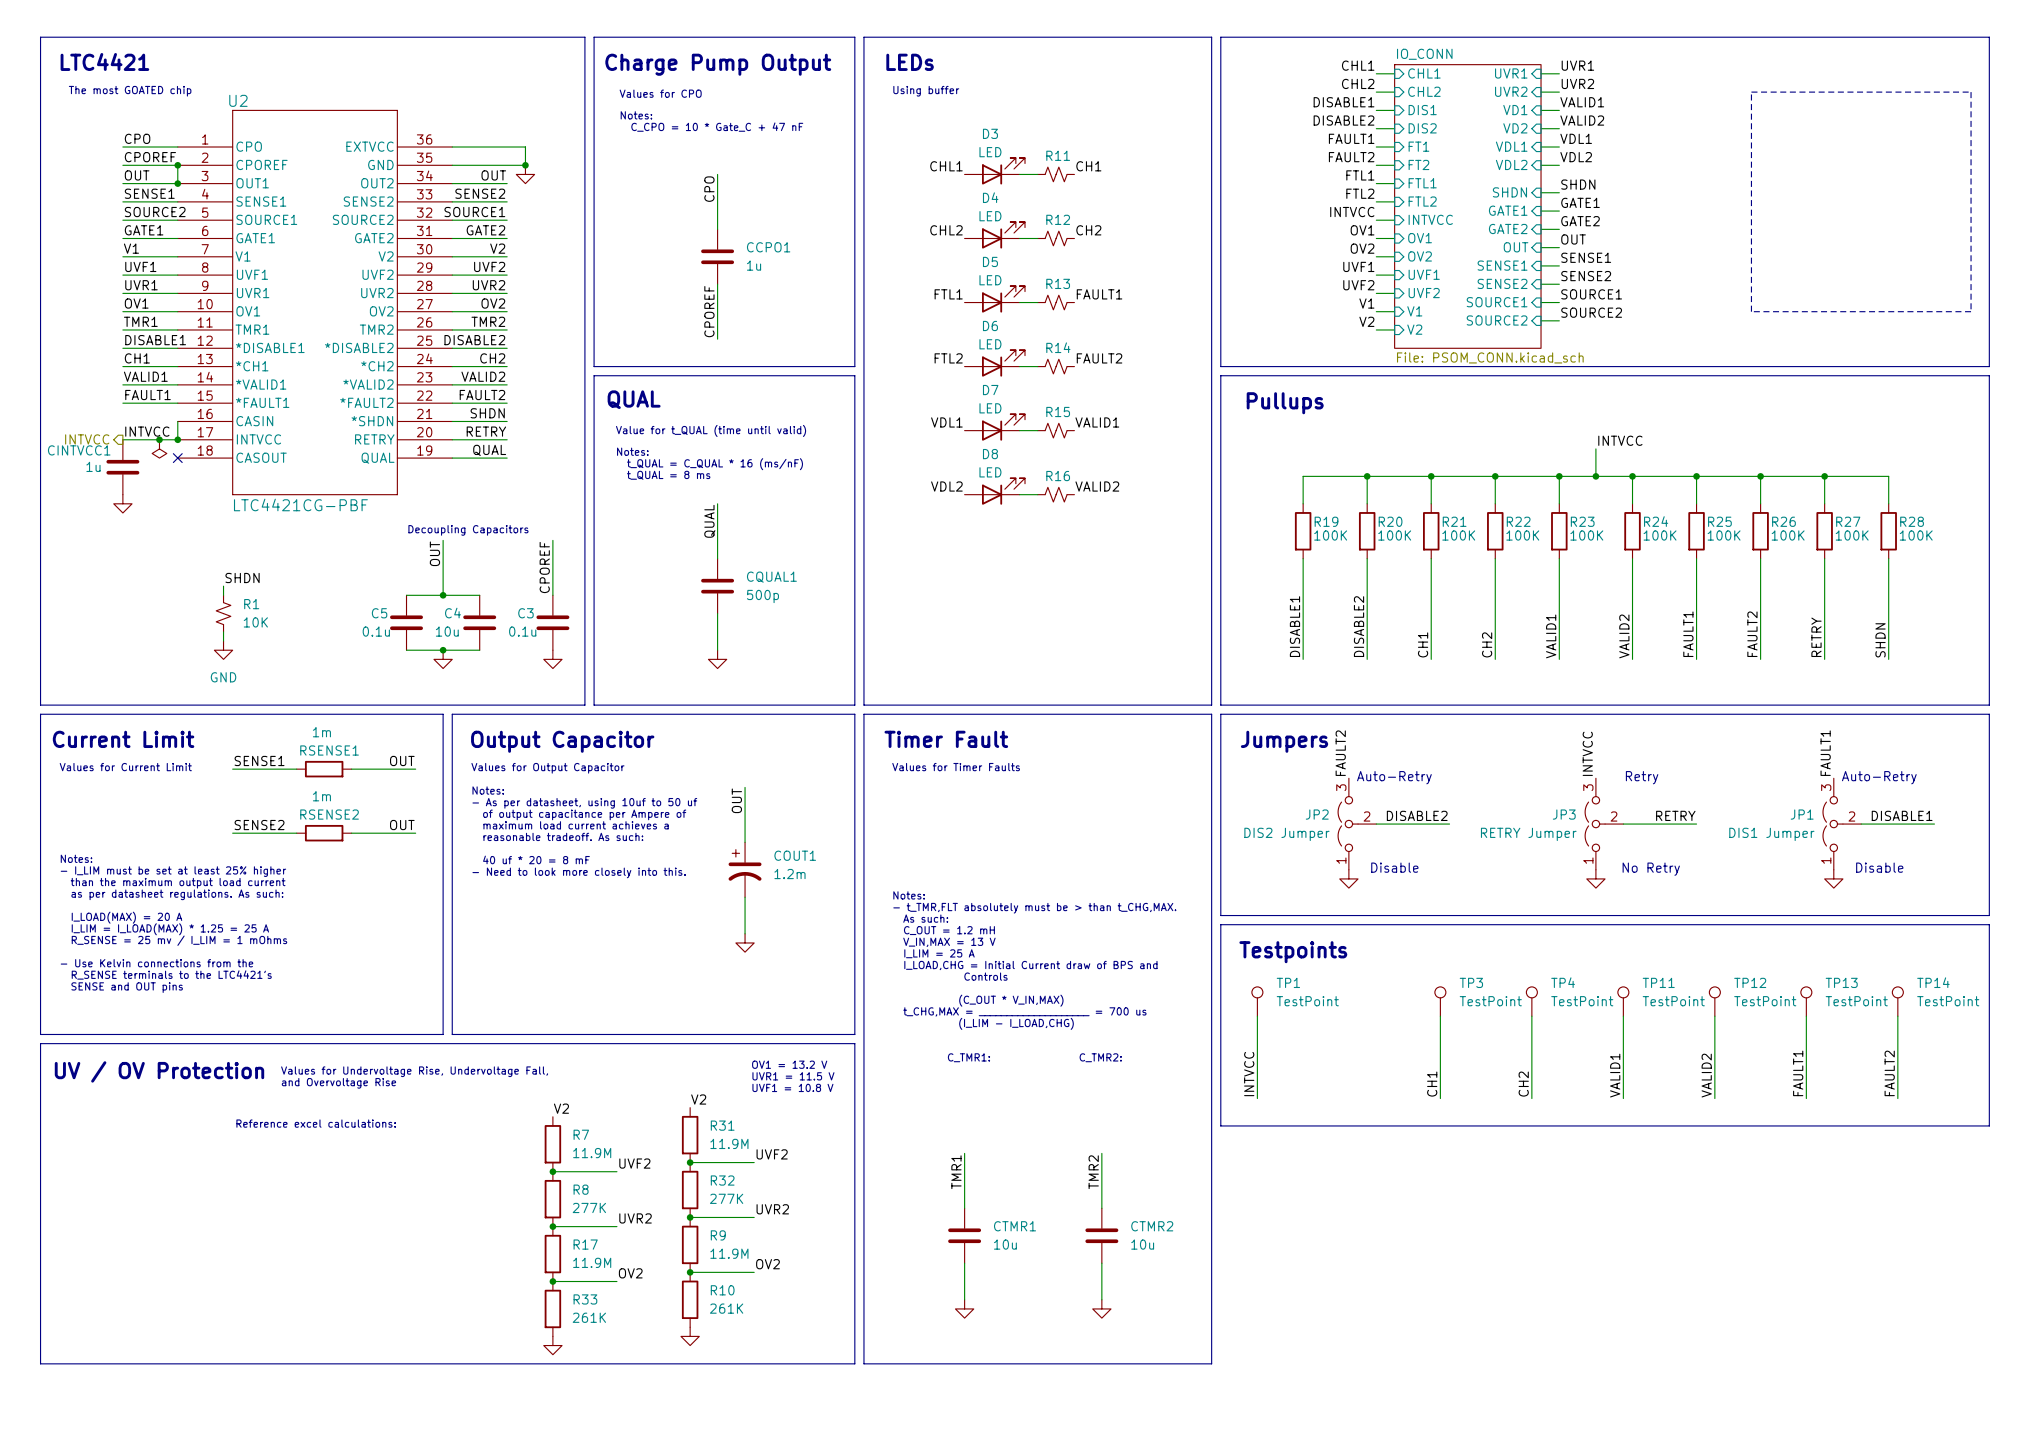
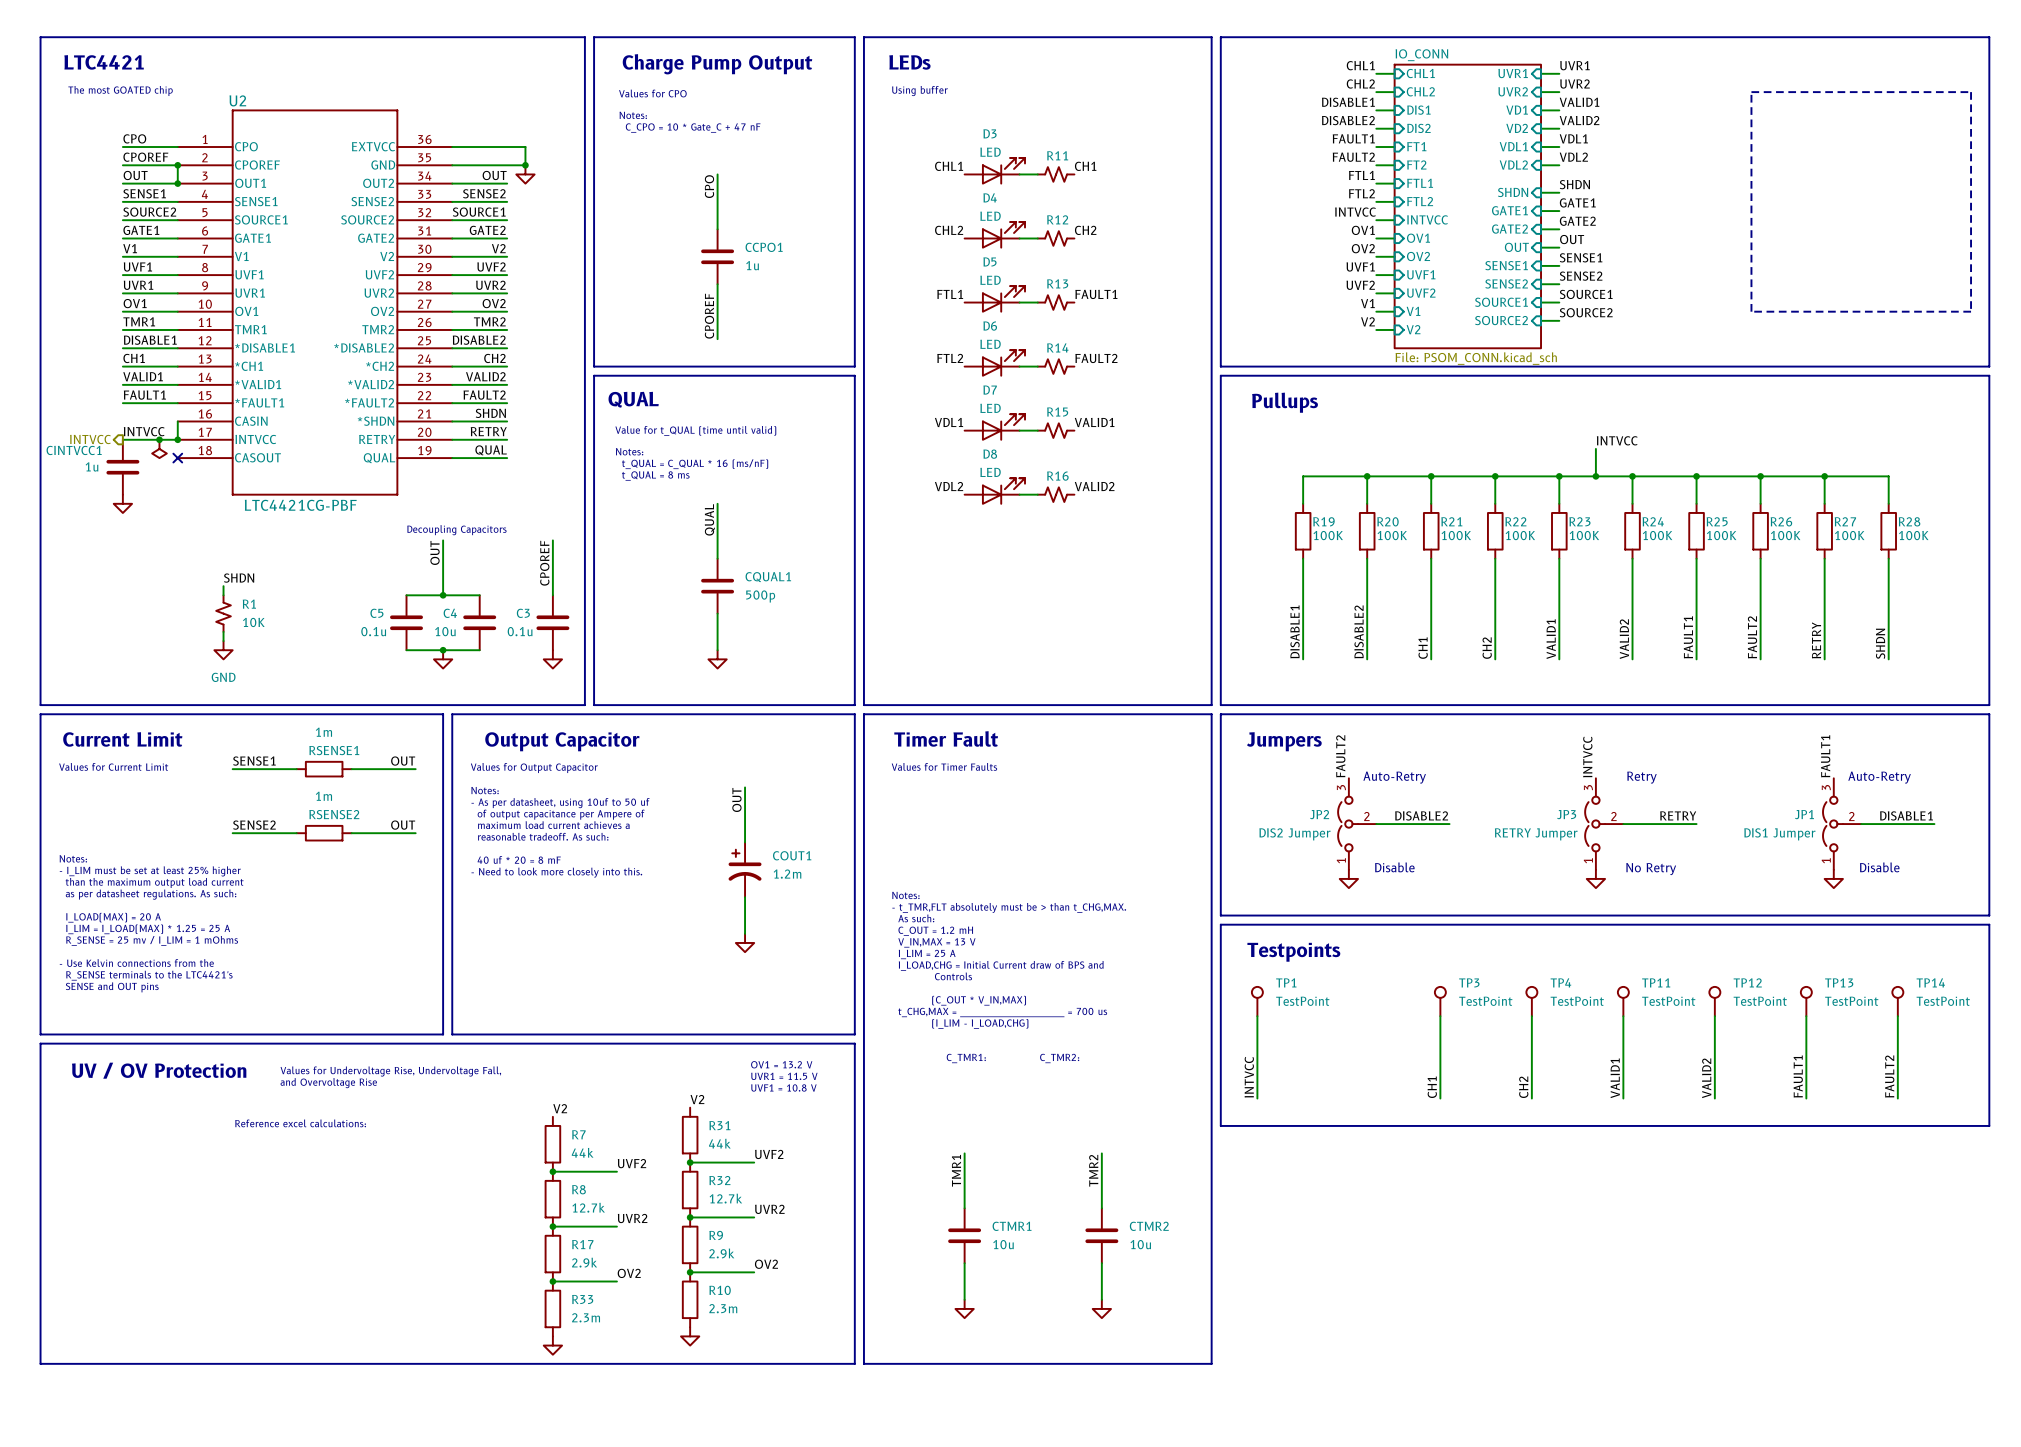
R31 value: 11.9M (729, 1143) -> 44k (719, 1143)
R7 value: 11.9M (592, 1153) -> 44k (582, 1152)
R32 value: 277K (726, 1198) -> 12.7k (725, 1198)
R8 value: 277K (589, 1207) -> 12.7k (588, 1207)
R9 value: 11.9M (729, 1253) -> 2.9k (721, 1253)
R17 value: 11.9M (592, 1262) -> 2.9k (584, 1262)
R10 value: 261K (726, 1308) -> 2.3m (723, 1308)
R33 value: 261K (589, 1317) -> 2.3m (586, 1317)

